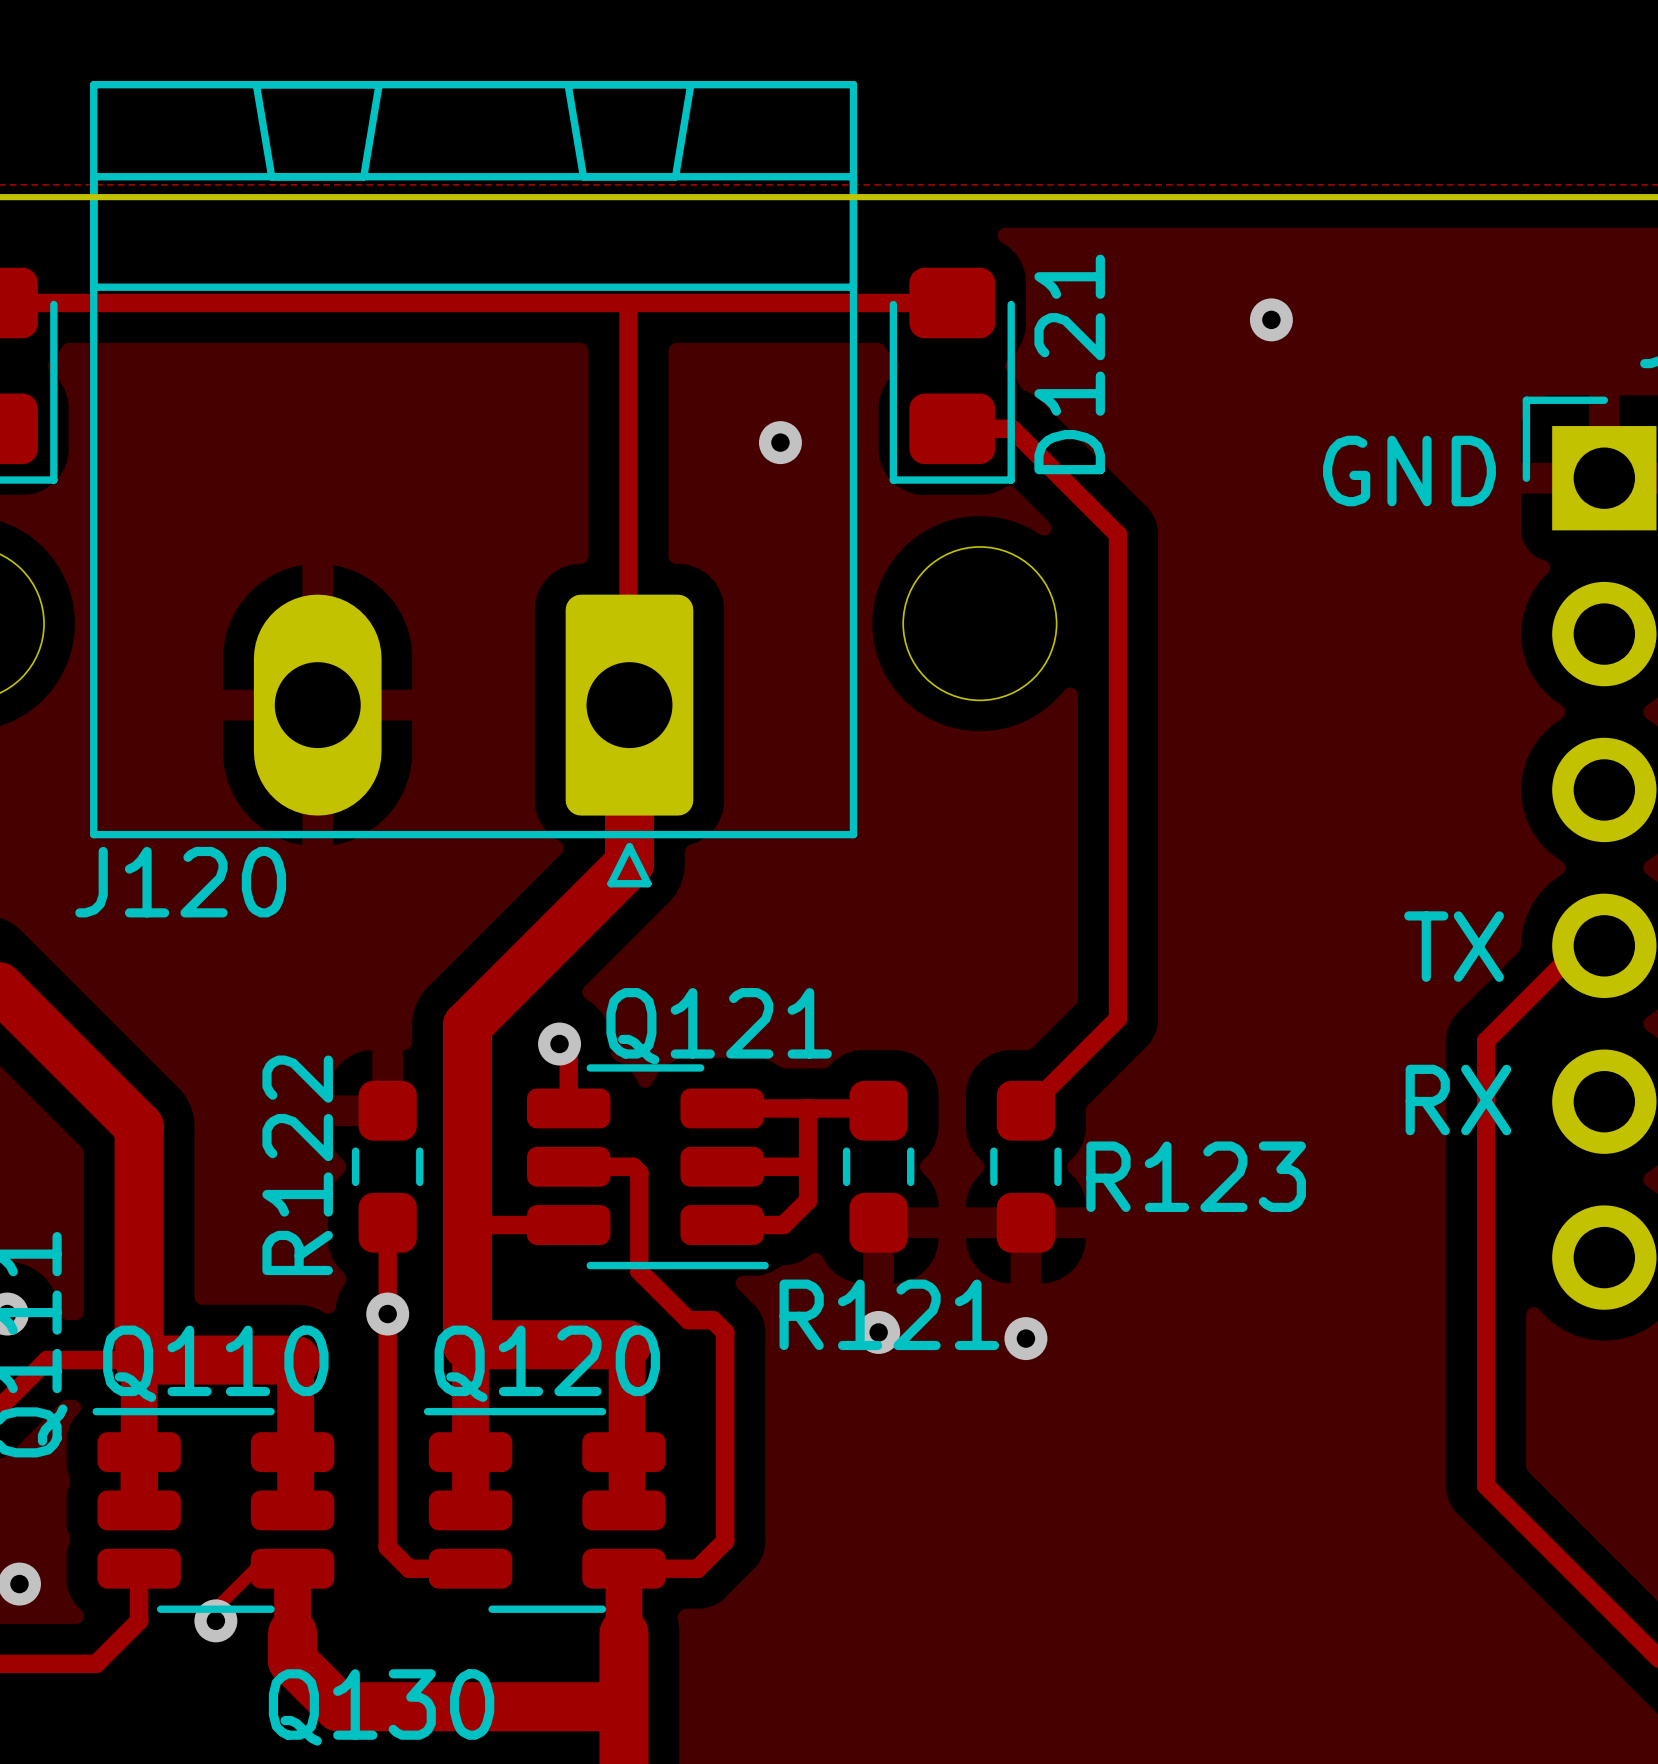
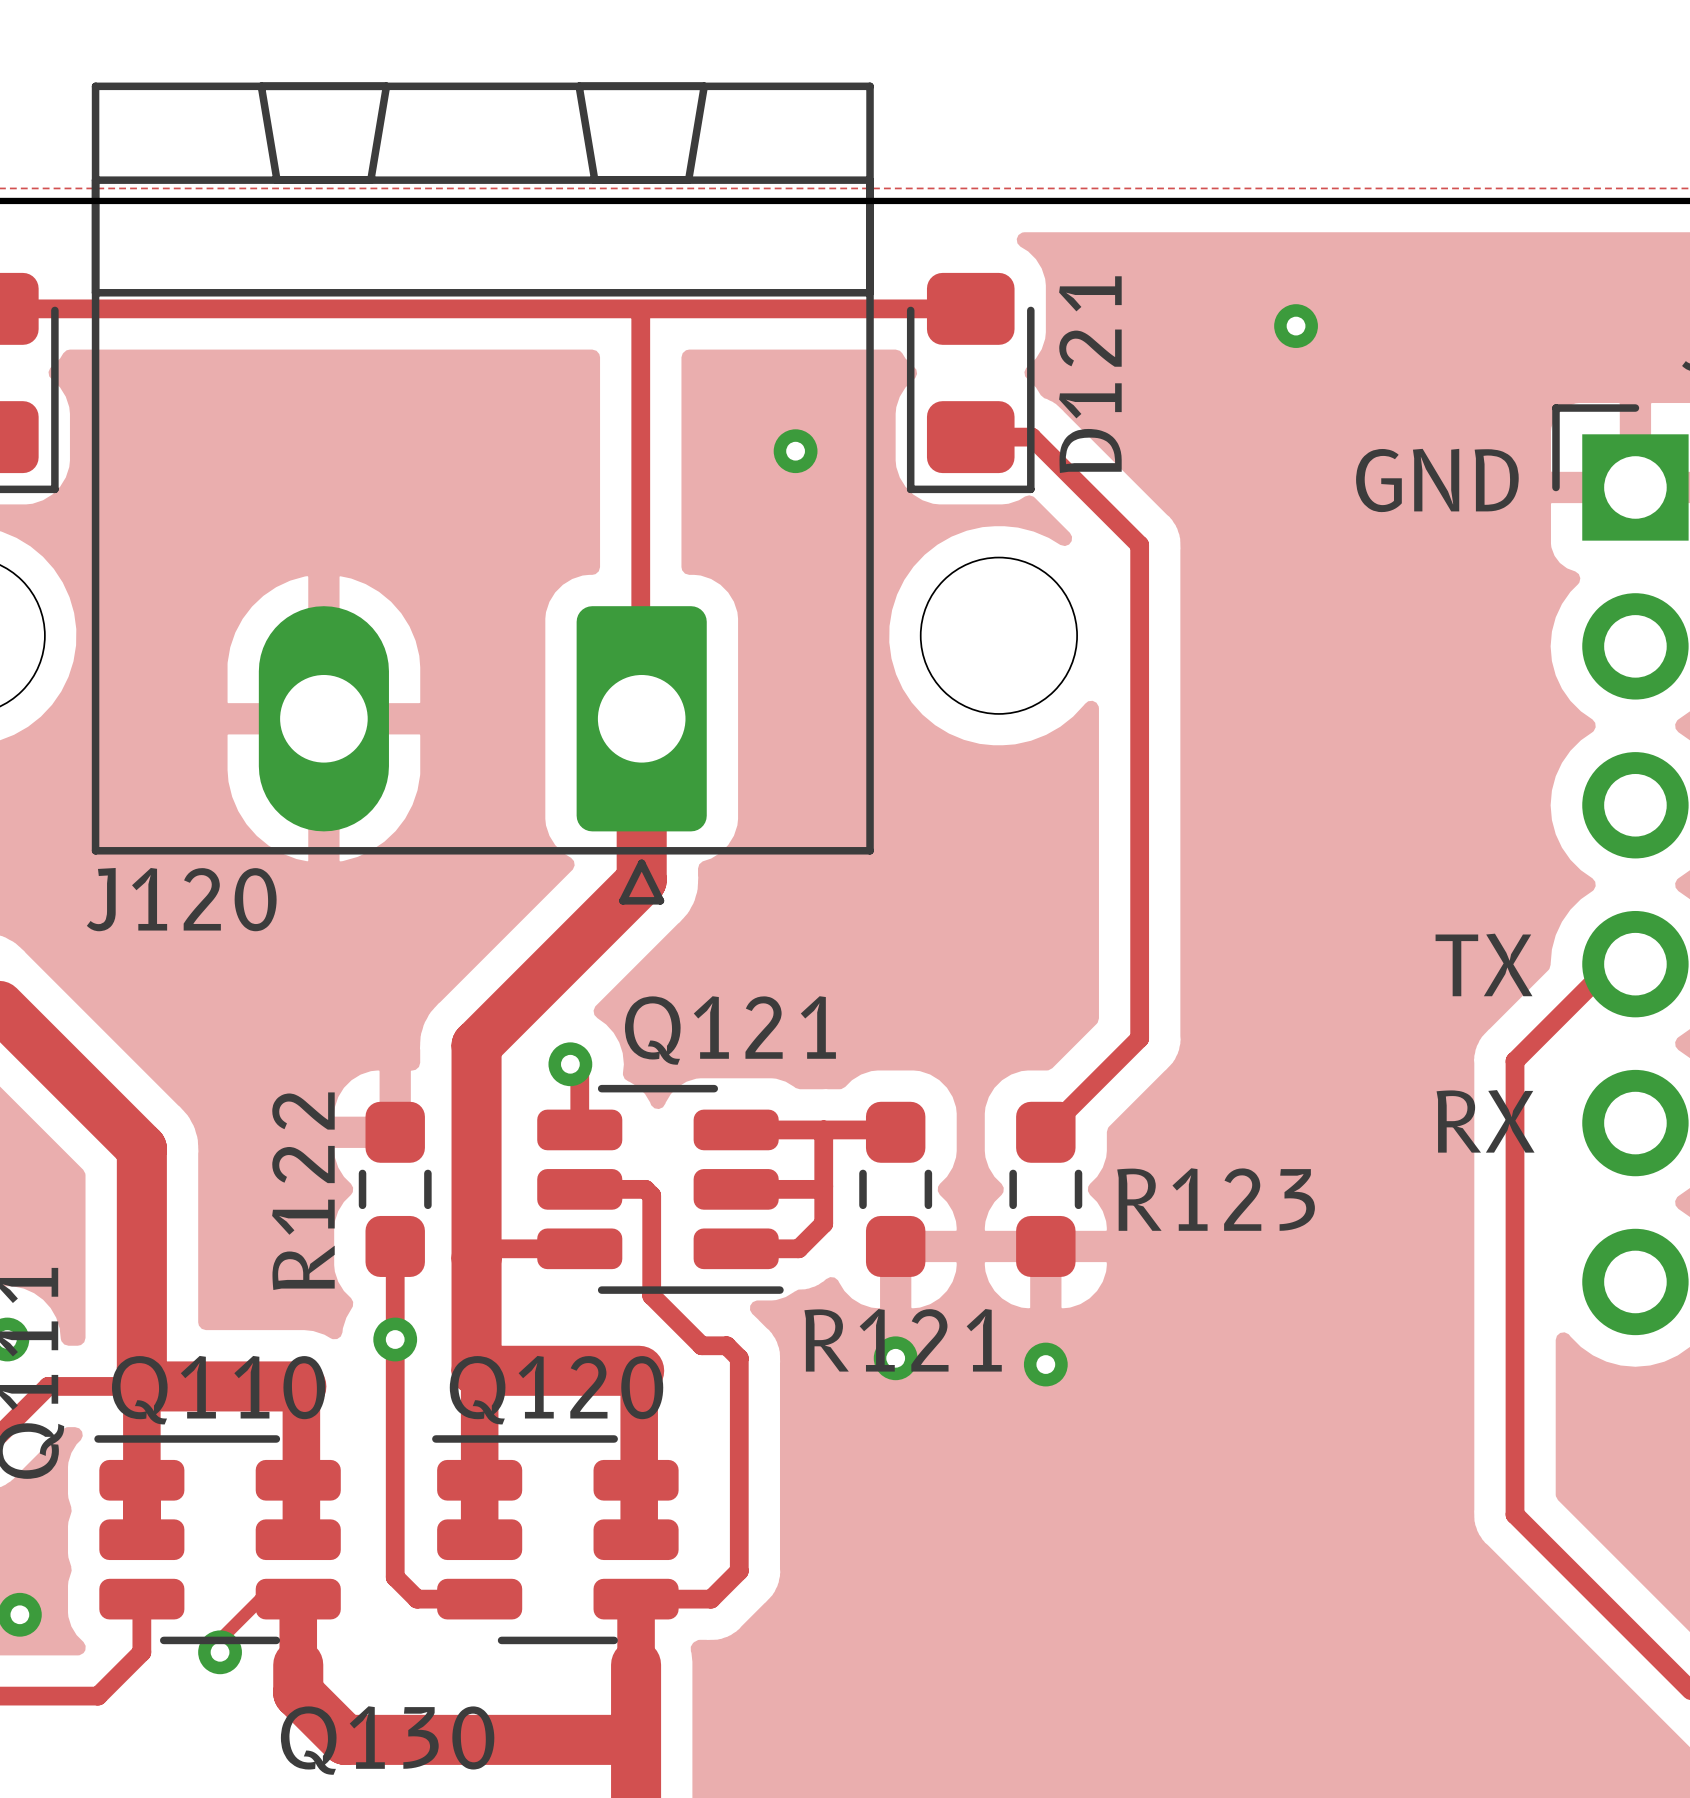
Q121 name position: Q121 (719, 1026) -> Q121 (730, 1030)

